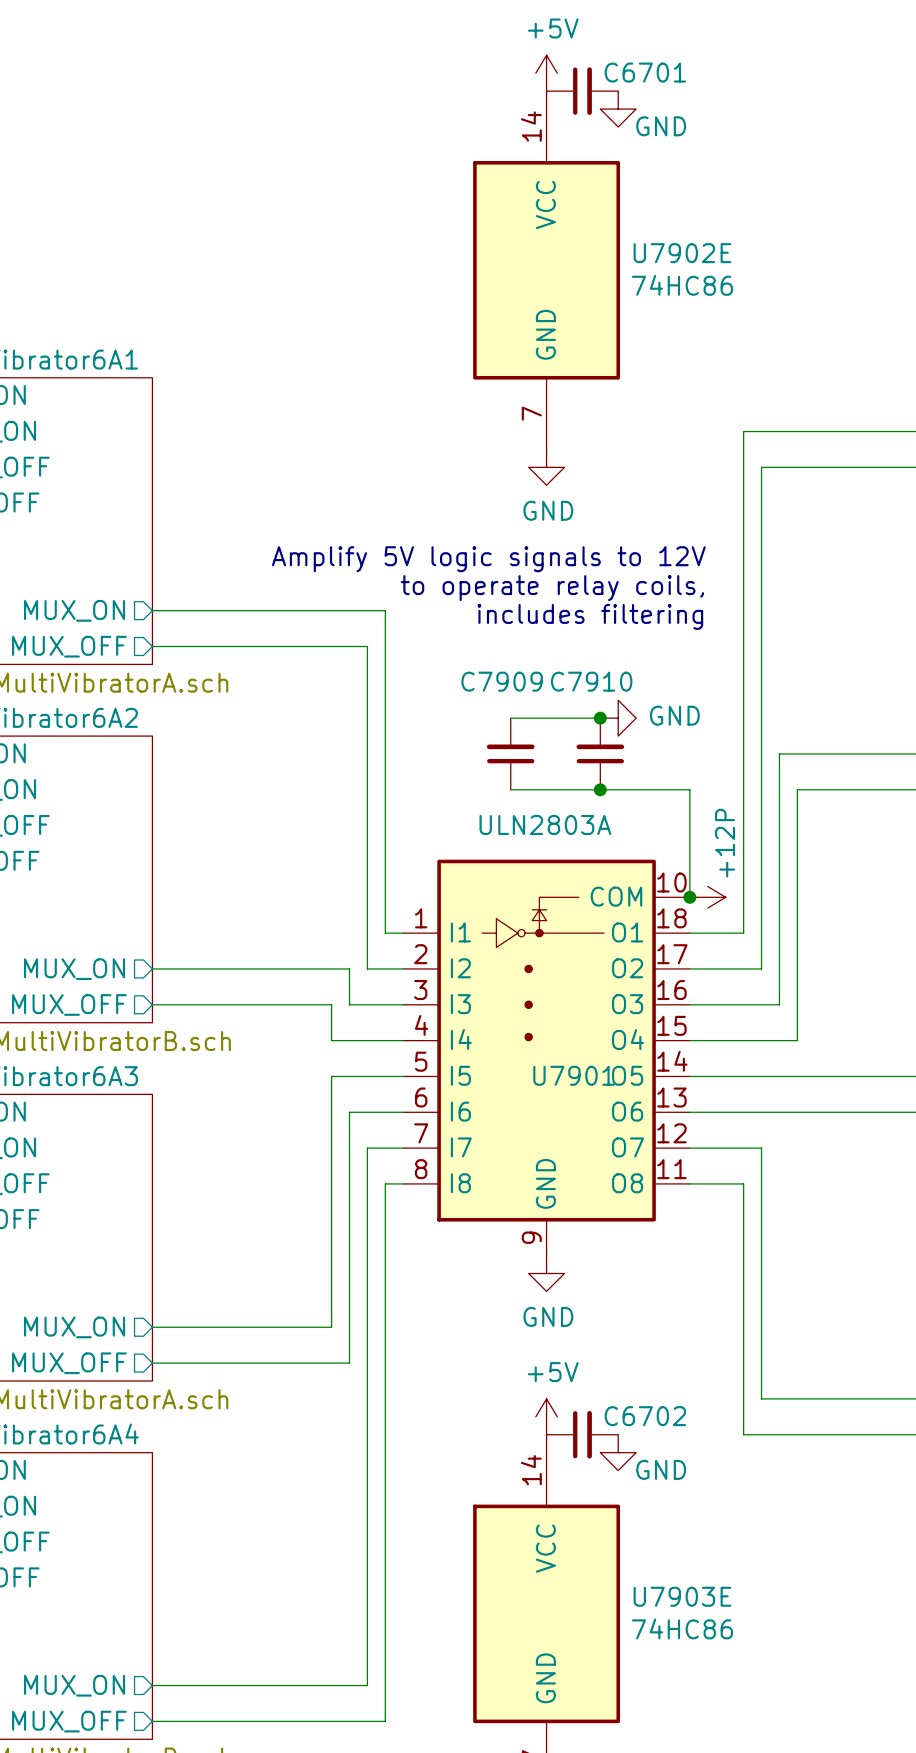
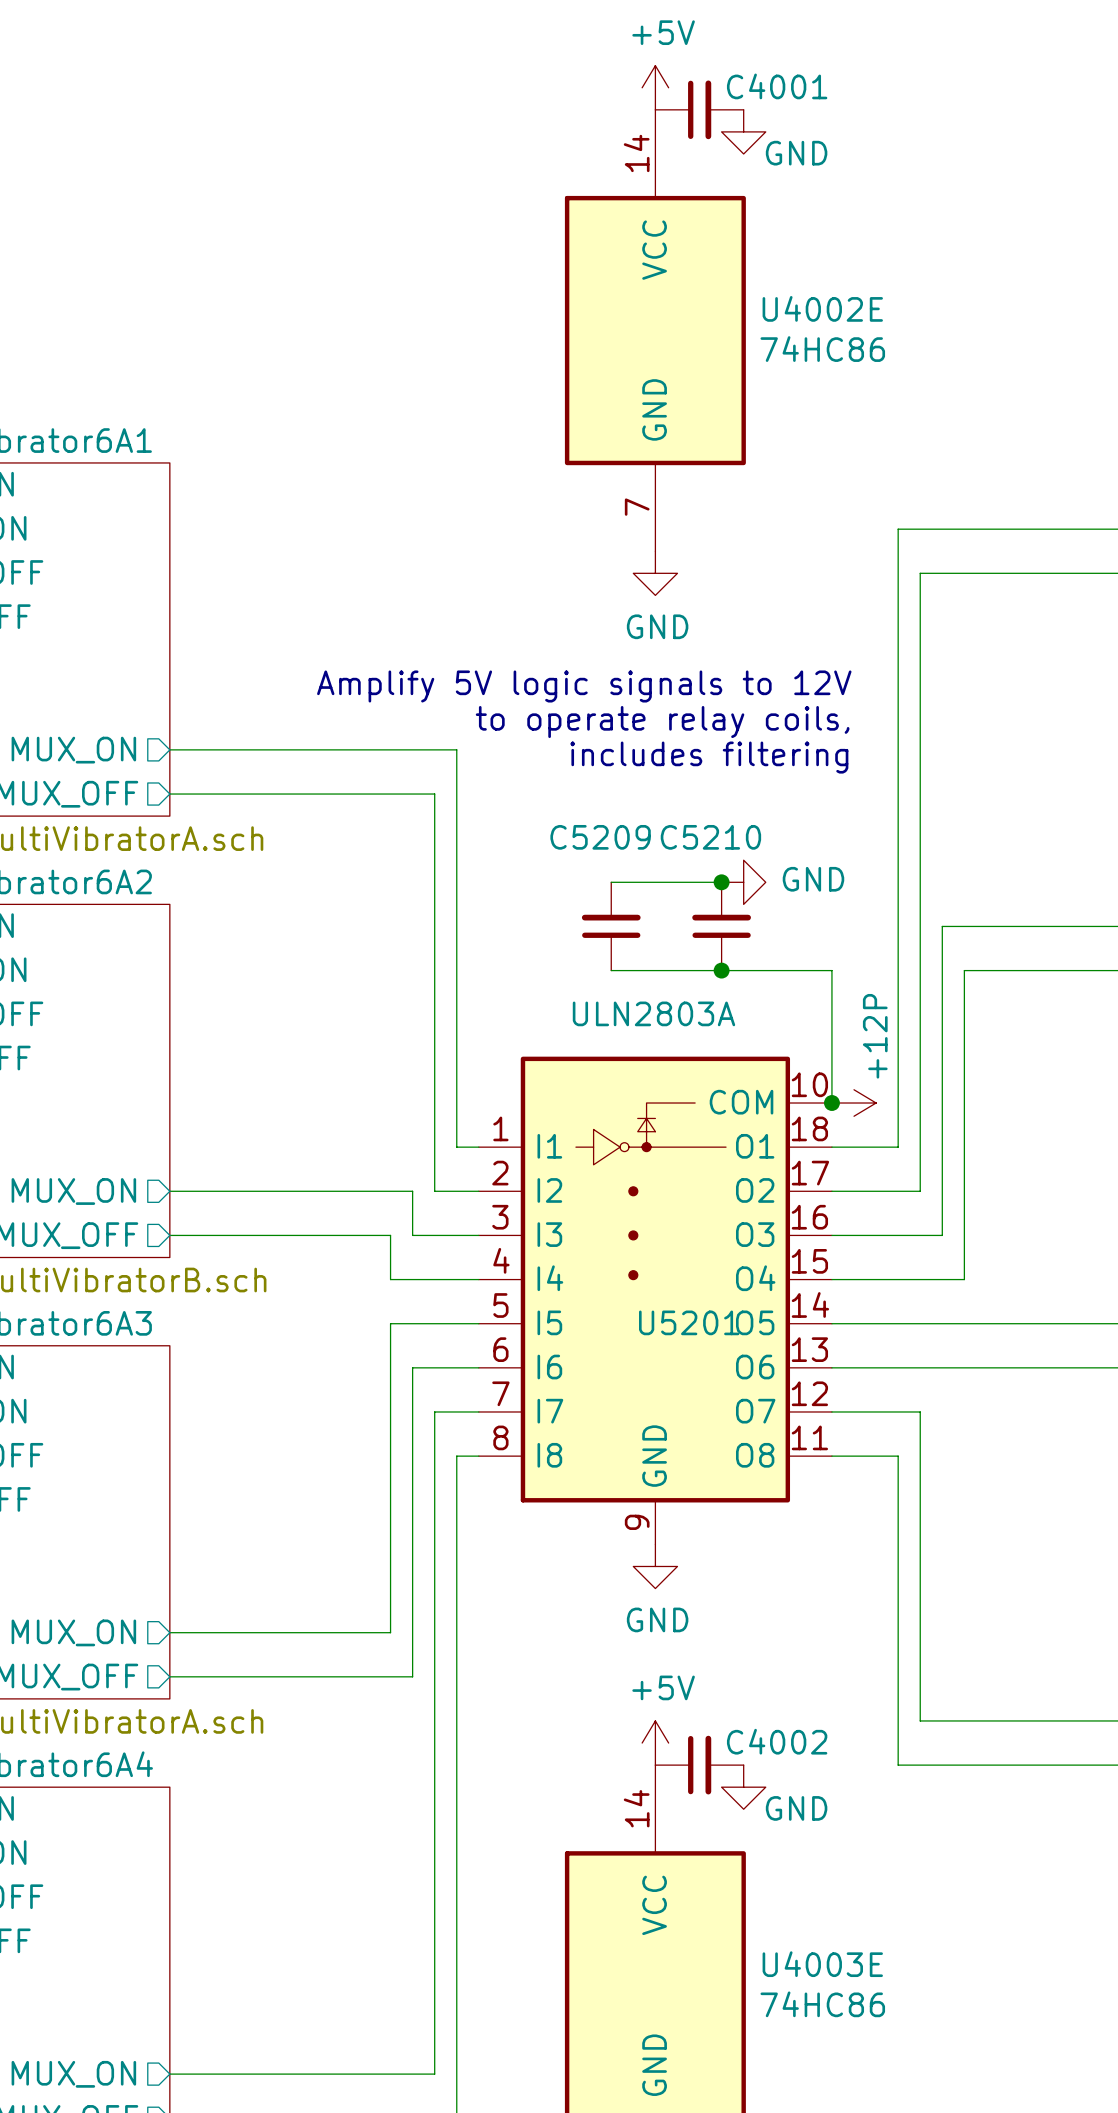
C6701 name: C6701 (645, 72) -> C4001 (777, 86)
U7902E name: U7902E (682, 253) -> U4002E (822, 308)
C7909 name: C7909 (502, 681) -> C5209 (600, 837)
C7910 name: C7910 (591, 681) -> C5210 (710, 837)
U7901 name: U7901 (574, 1075) -> U5201 (689, 1322)
C6702 name: C6702 (645, 1416) -> C4002 (777, 1741)
U7903E name: U7903E (682, 1596) -> U4003E (822, 1964)

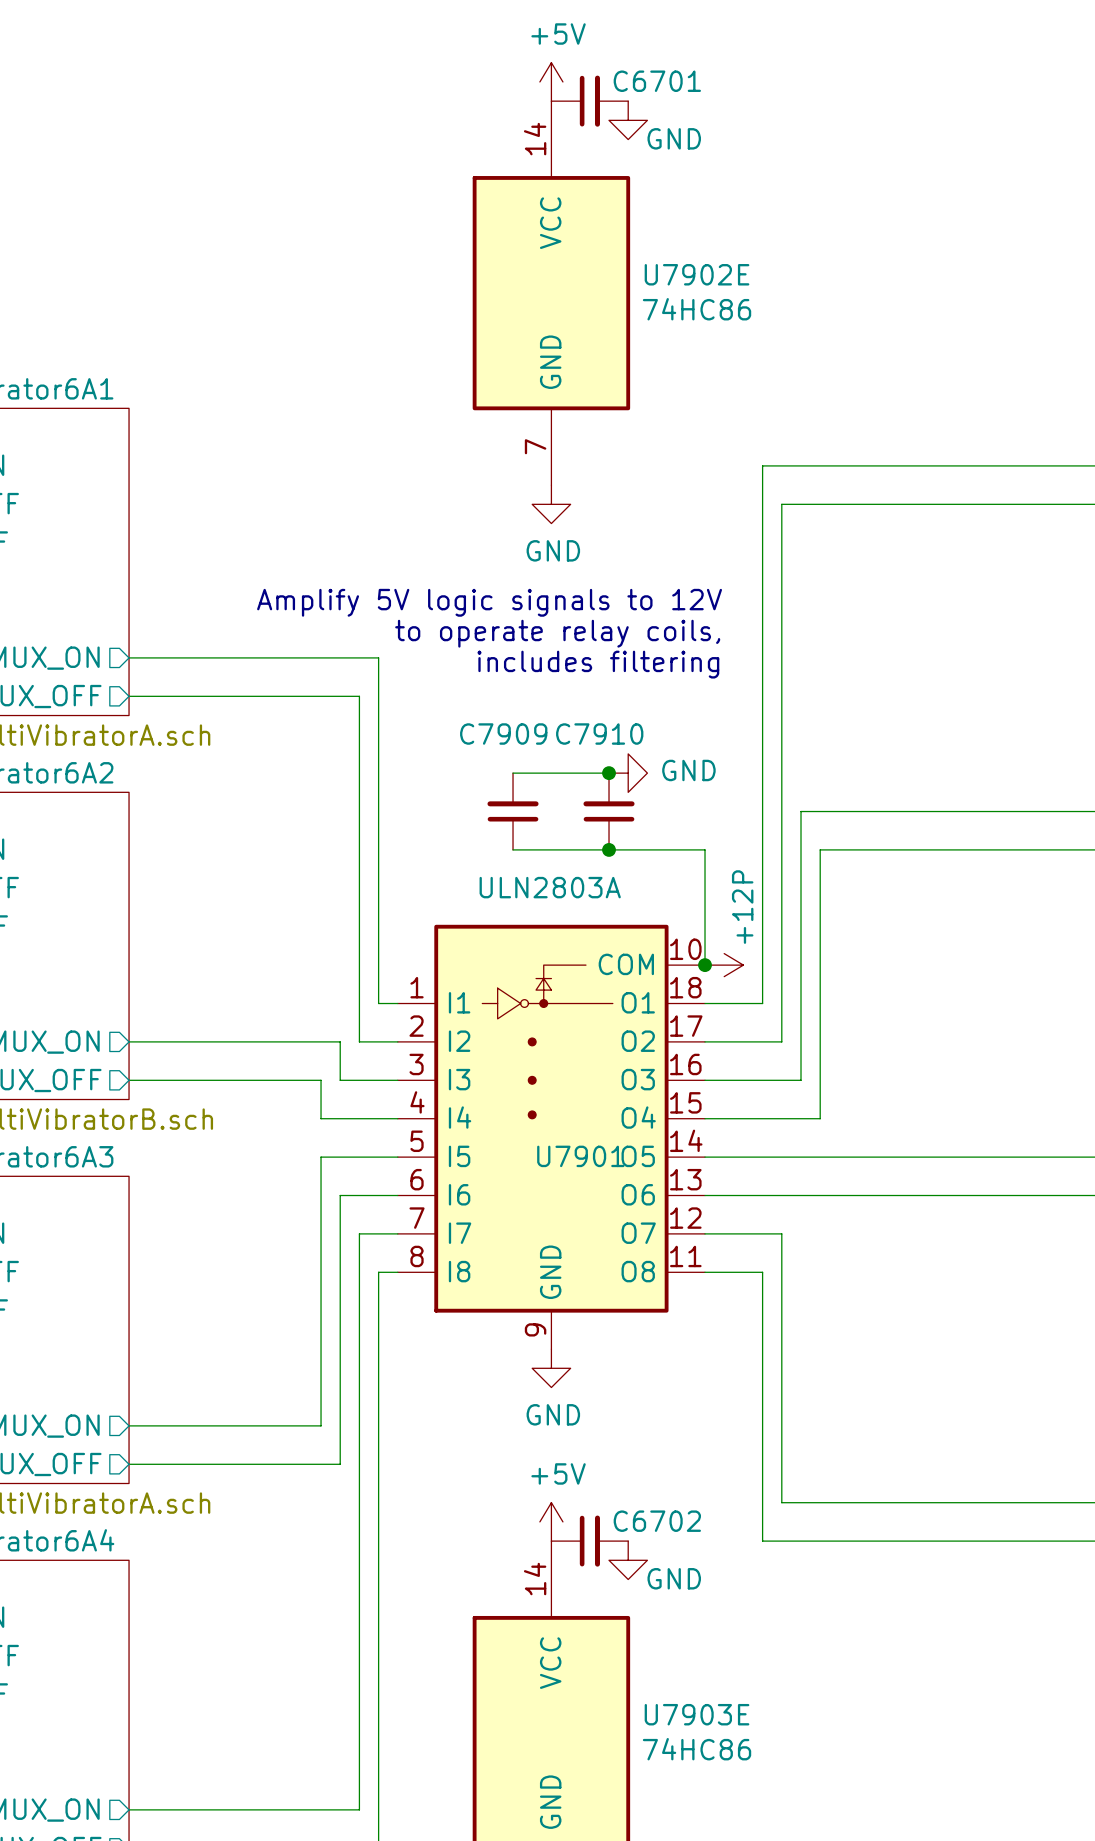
C4001 name: C4001 (777, 86) -> C6701 (657, 81)
U4002E name: U4002E (822, 308) -> U7902E (697, 274)
C5209 name: C5209 (600, 837) -> C7909 (503, 734)
C5210 name: C5210 (710, 837) -> C7910 (599, 734)
U5201 name: U5201 (689, 1322) -> U7901 (580, 1156)
C4002 name: C4002 (777, 1741) -> C6702 (657, 1521)
U4003E name: U4003E (822, 1964) -> U7903E (697, 1714)

